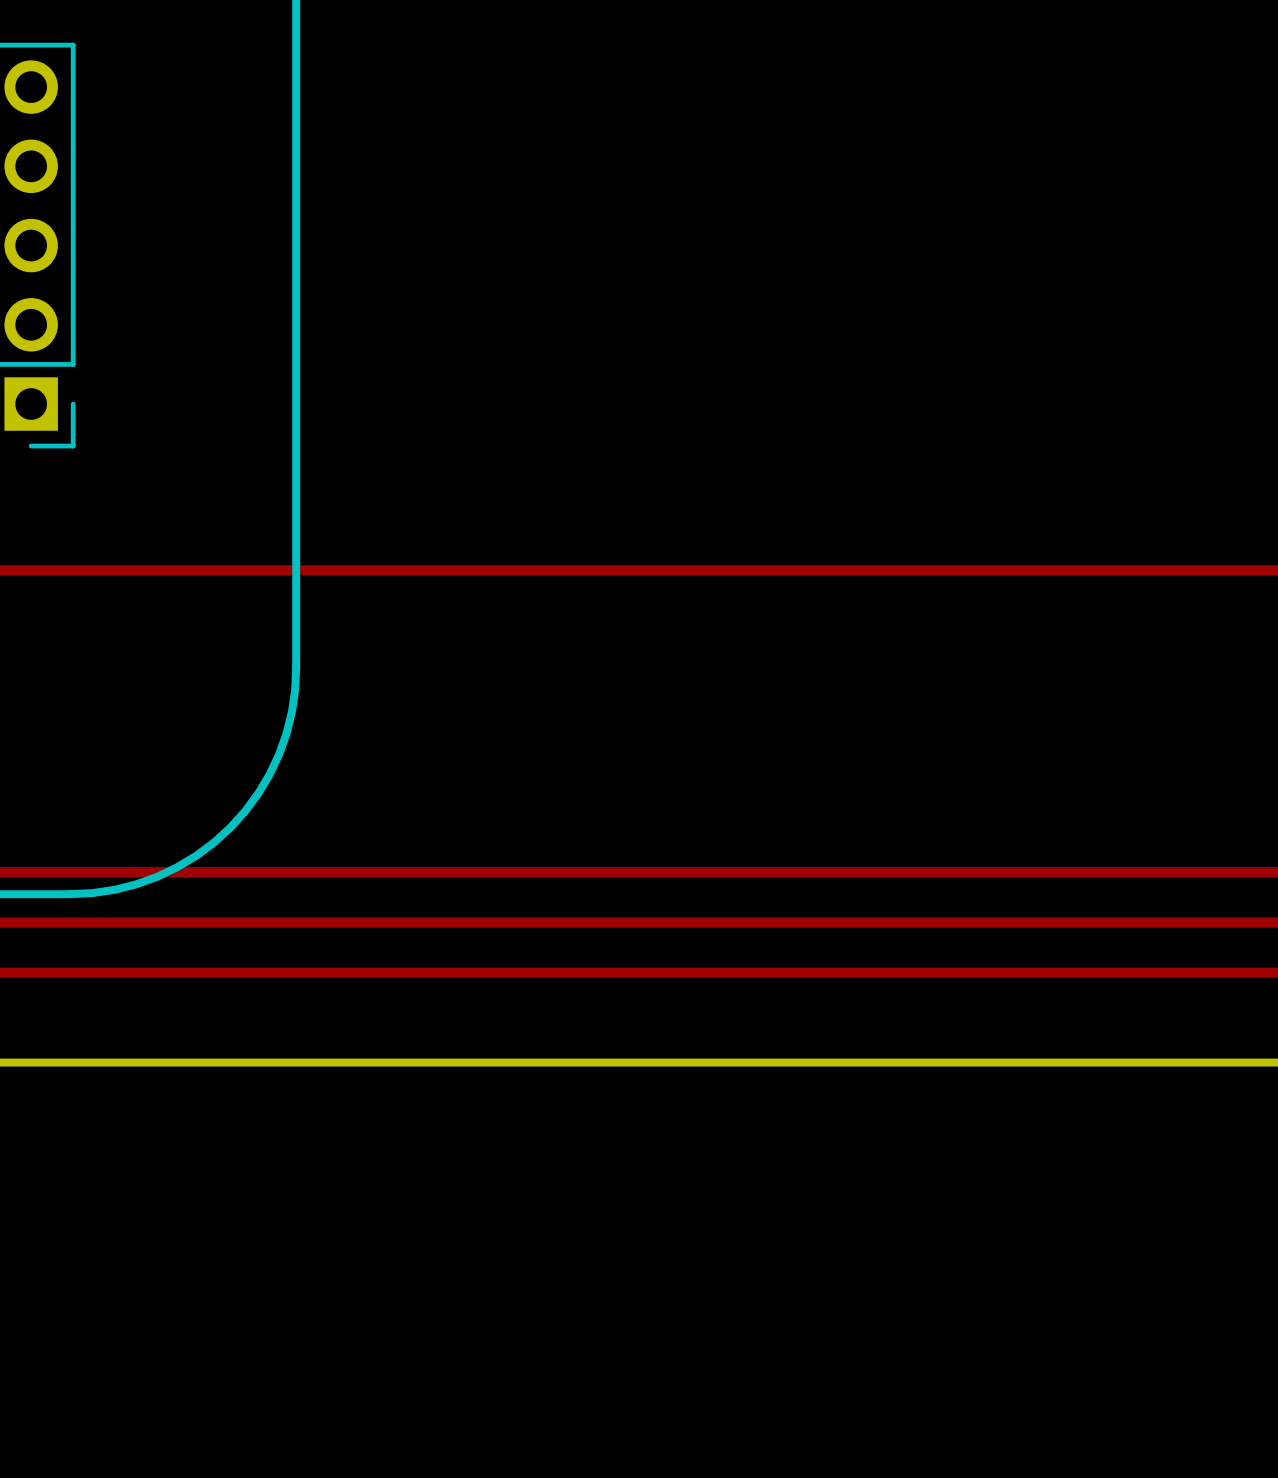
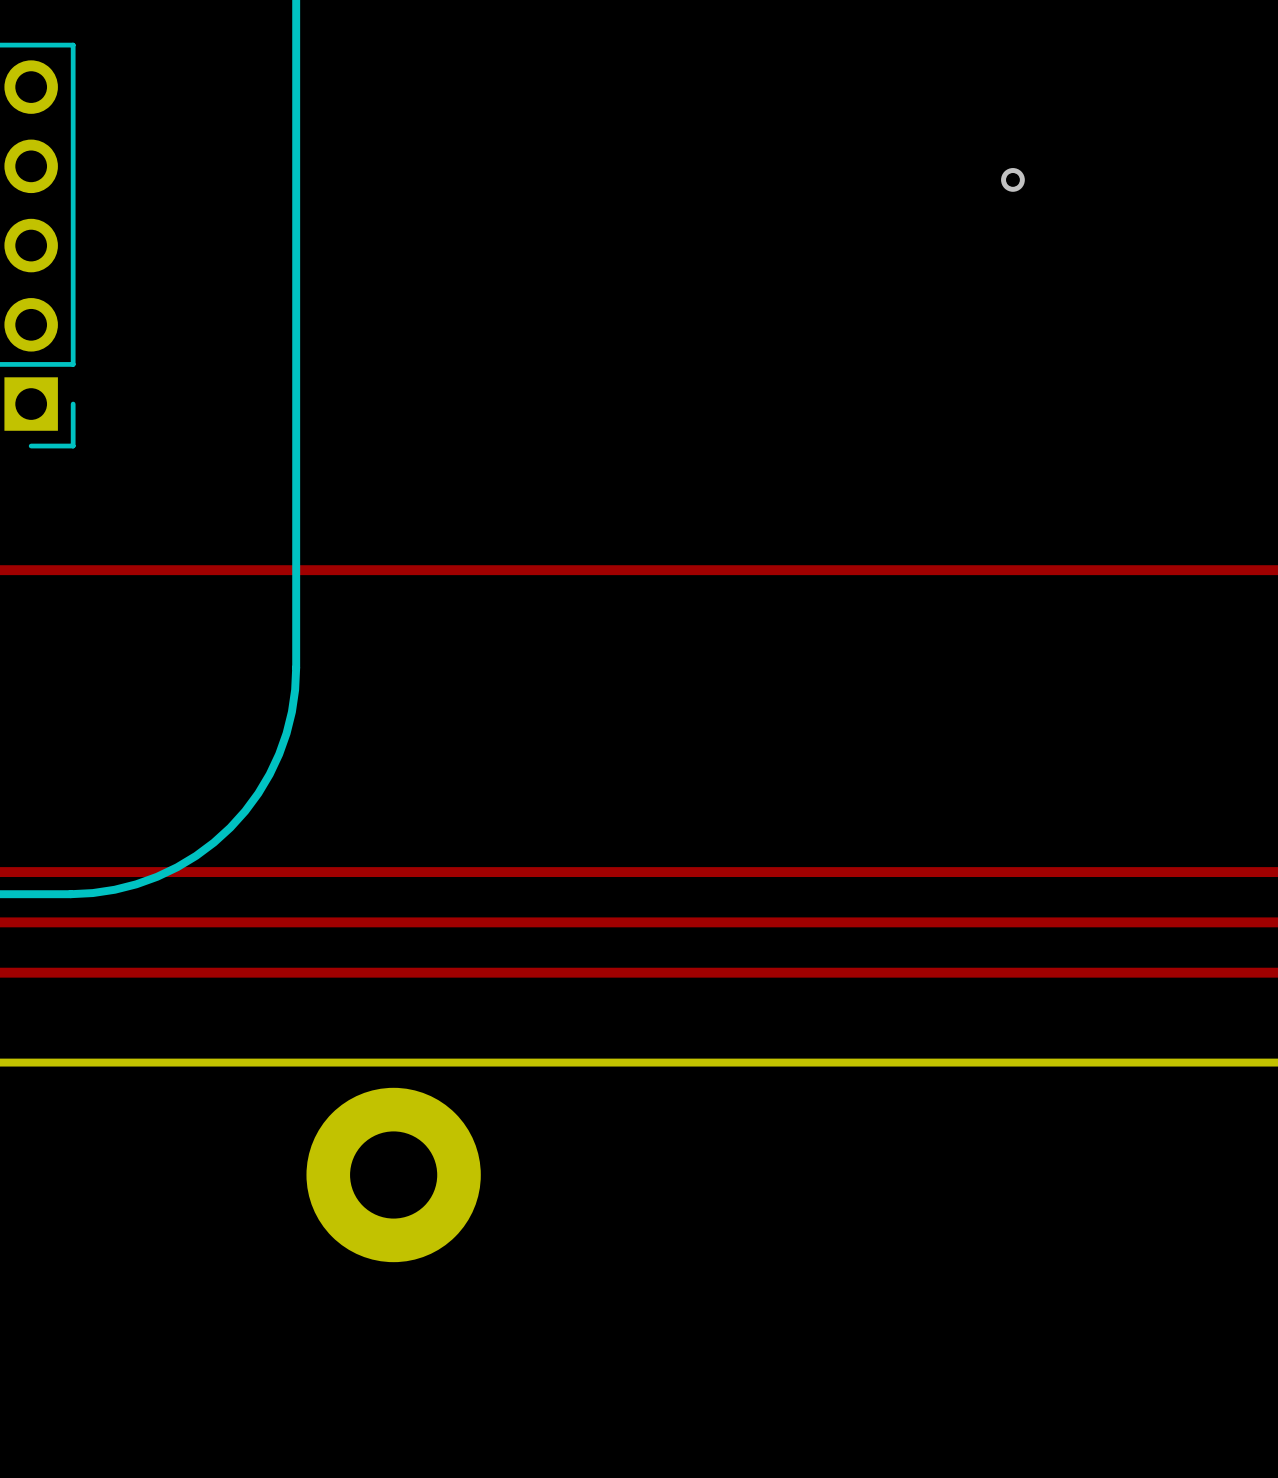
via: none -> (1012, 179)
part: none -> (393, 1174)

